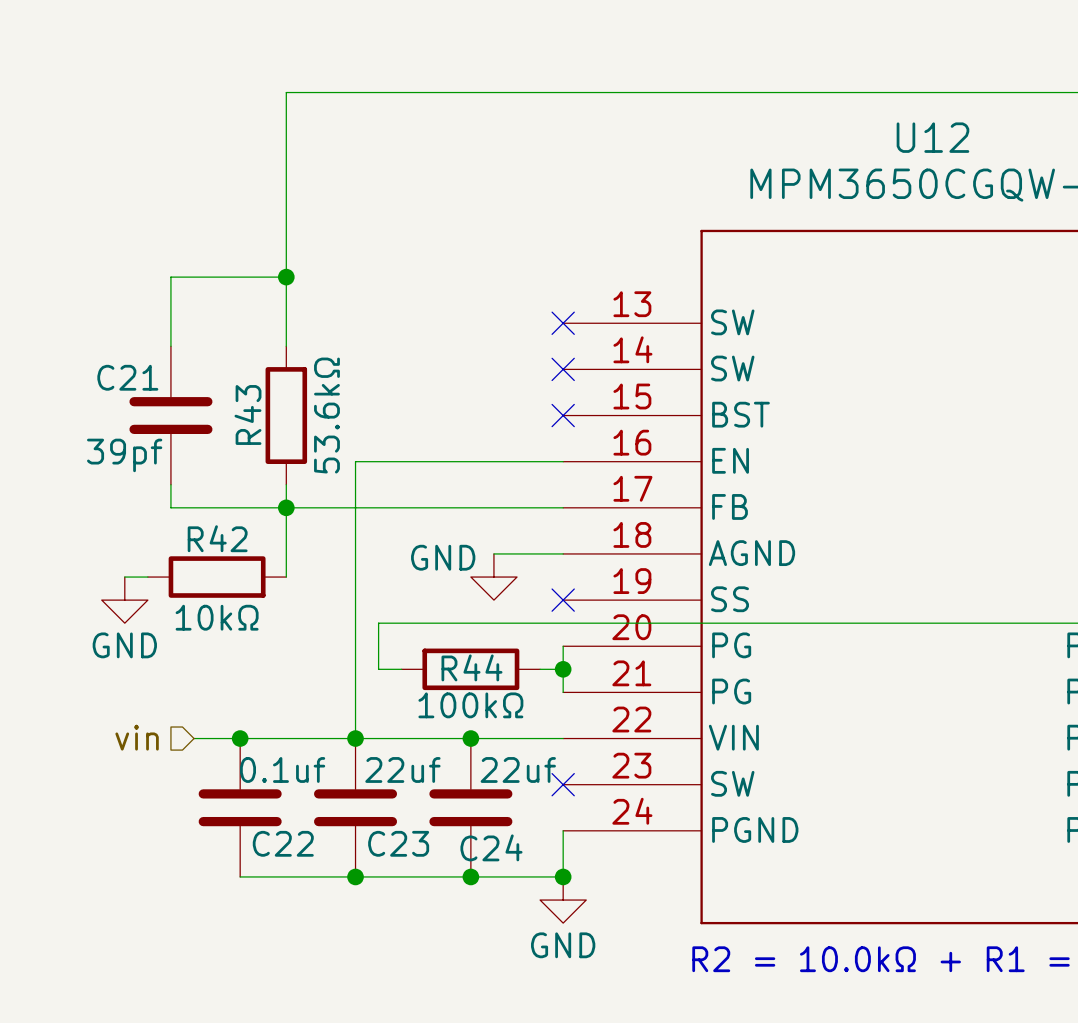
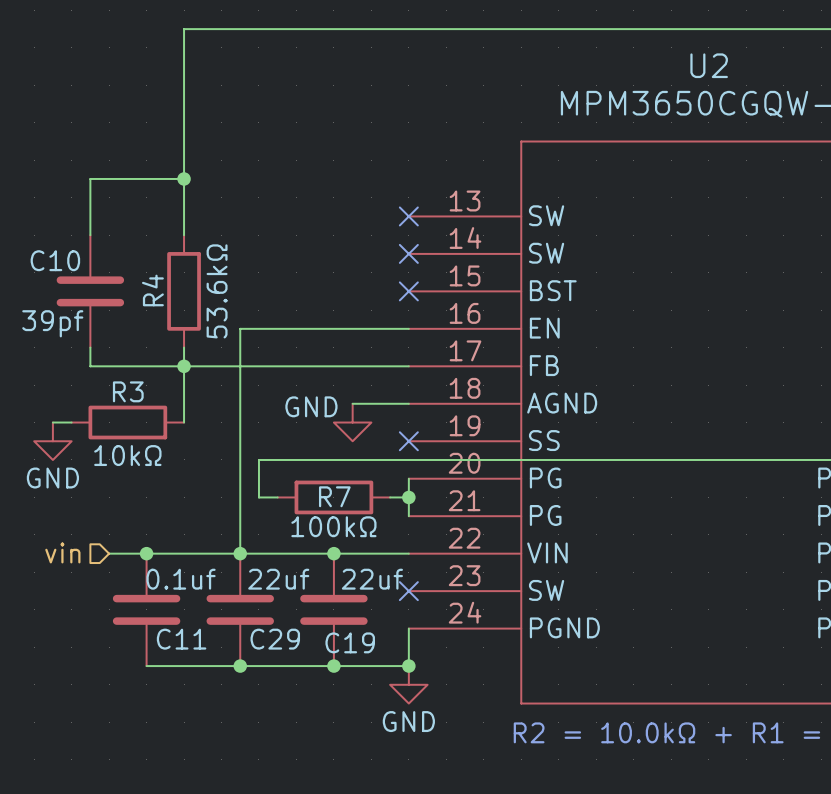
U12 name: U12 (932, 137) -> U2 (709, 65)
C21 name: C21 (127, 377) -> C10 (55, 260)
R43 name: R43 (247, 414) -> R4 (152, 290)
R42 name: R42 (217, 538) -> R3 (128, 391)
R44 name: R44 (471, 667) -> R7 (334, 496)
C22 name: C22 (283, 843) -> C11 (181, 639)
C23 name: C23 (398, 843) -> C29 (275, 639)
C24 name: C24 (491, 847) -> C19 (350, 642)

